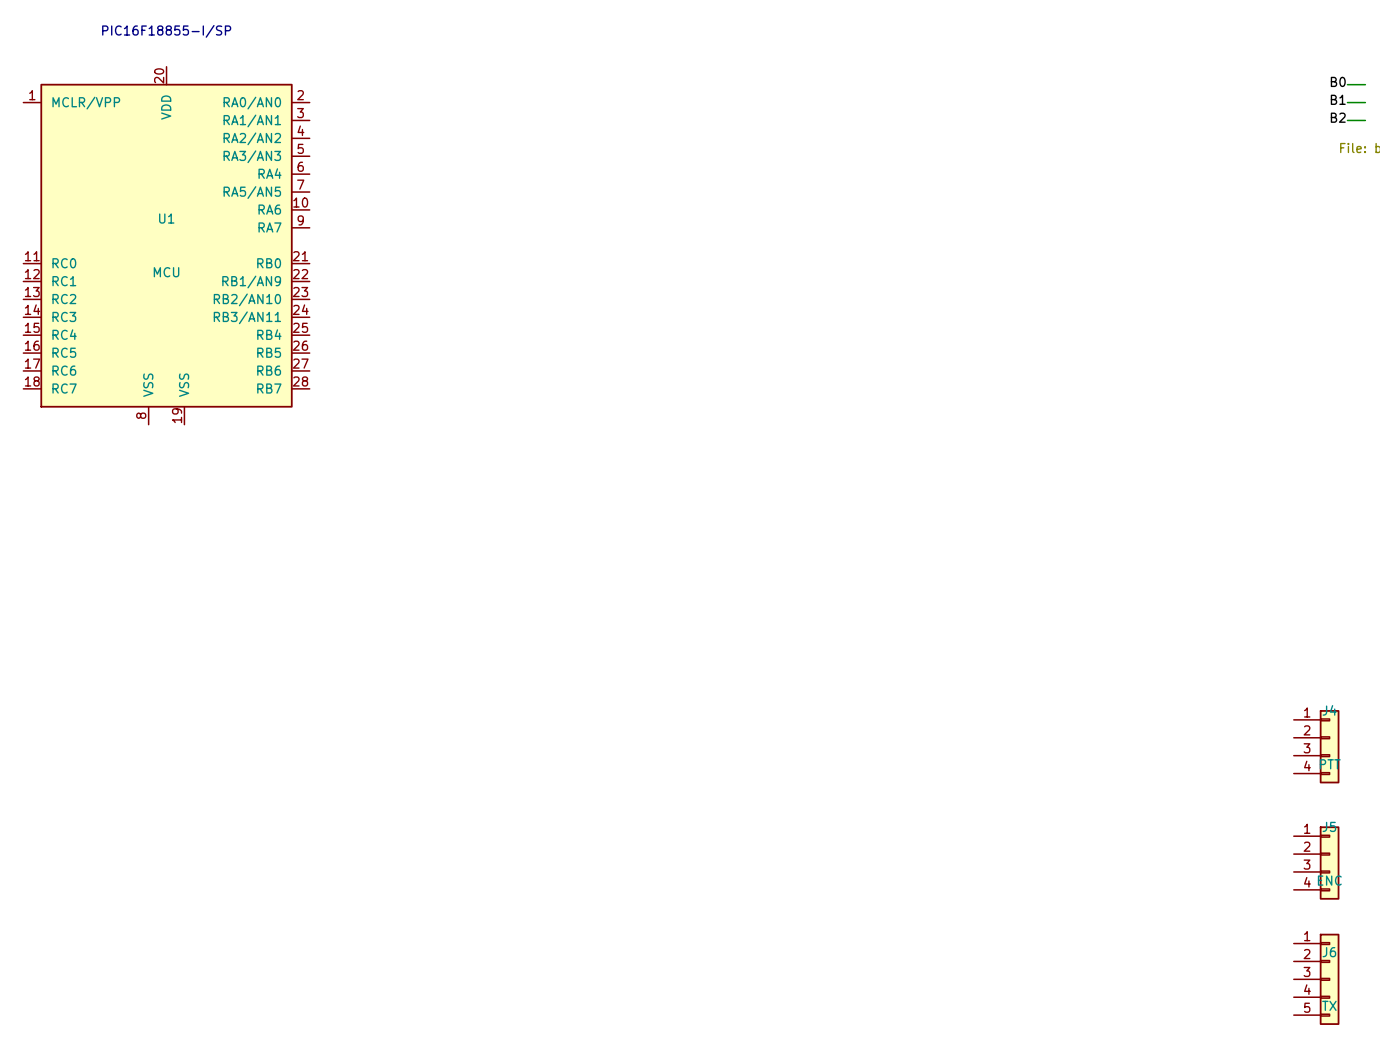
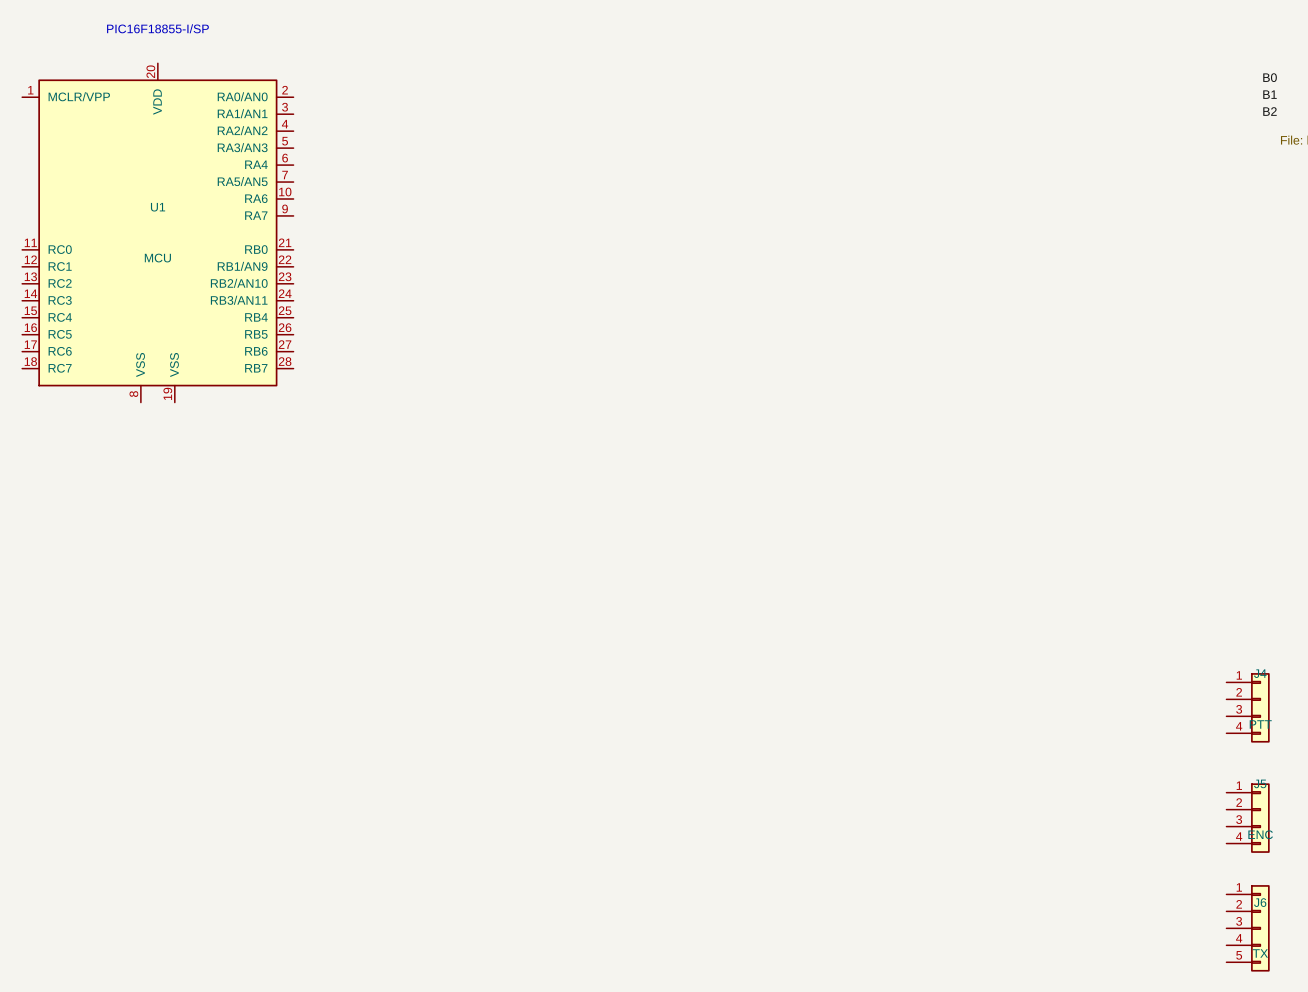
wire: (1347, 84) (1365, 84) -> none
wire: (1347, 102) (1365, 102) -> none
wire: (1347, 120) (1365, 120) -> none

